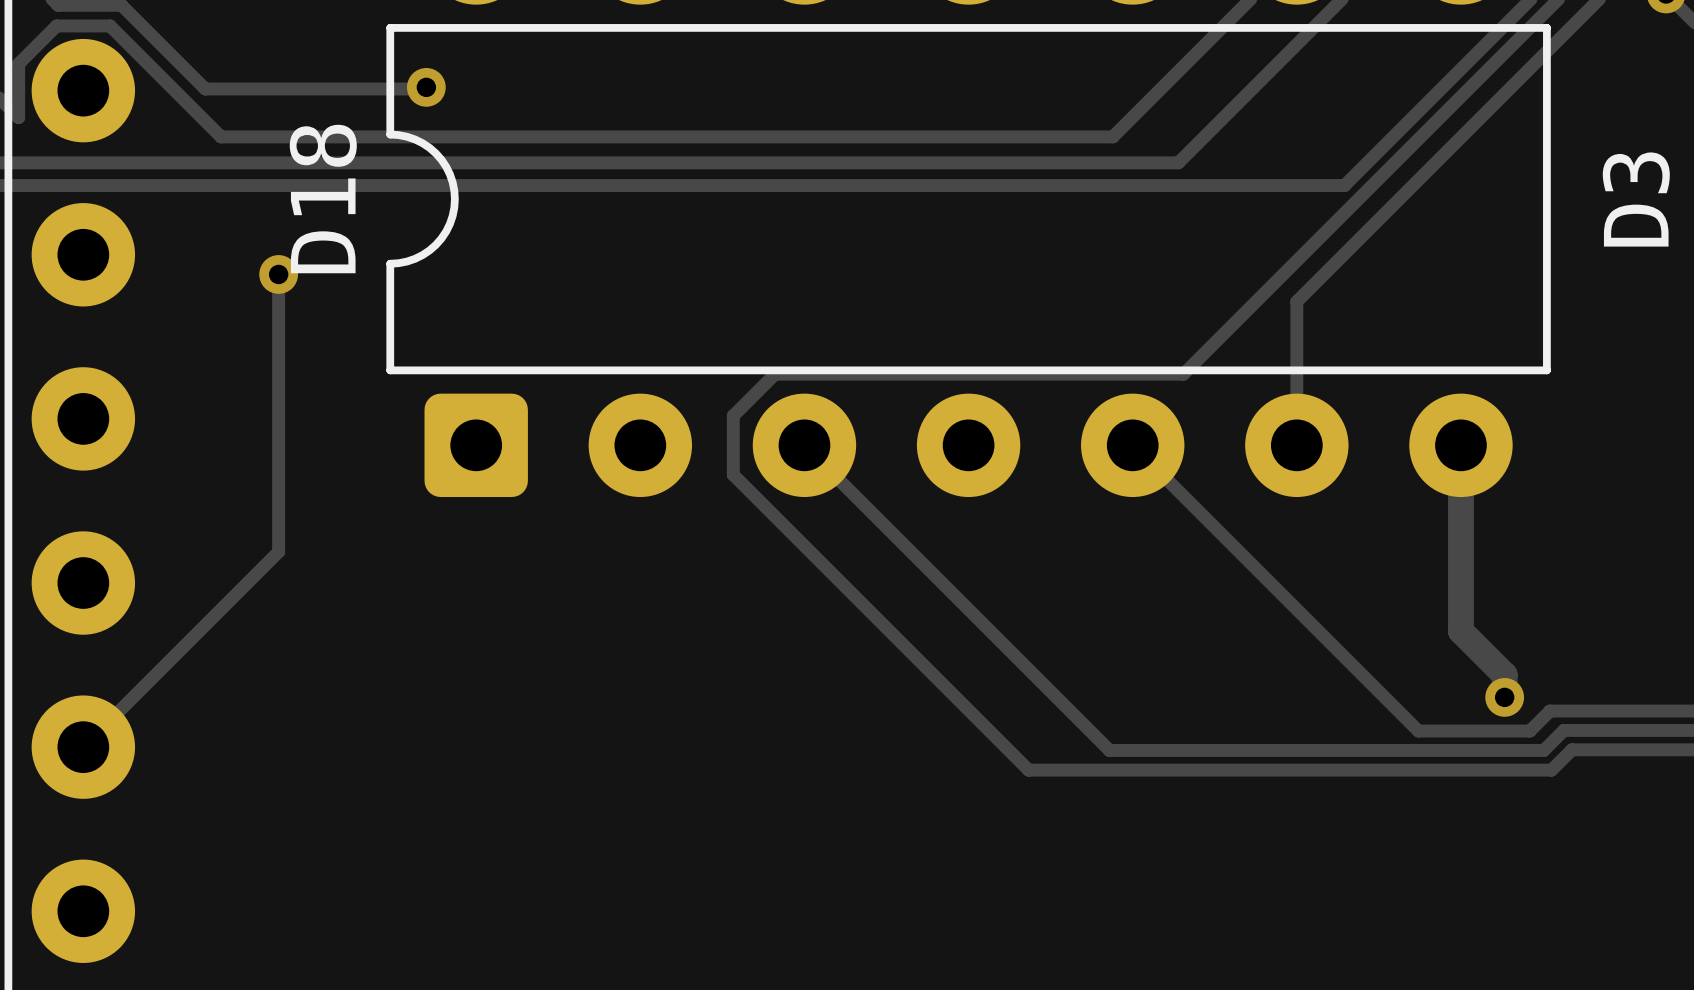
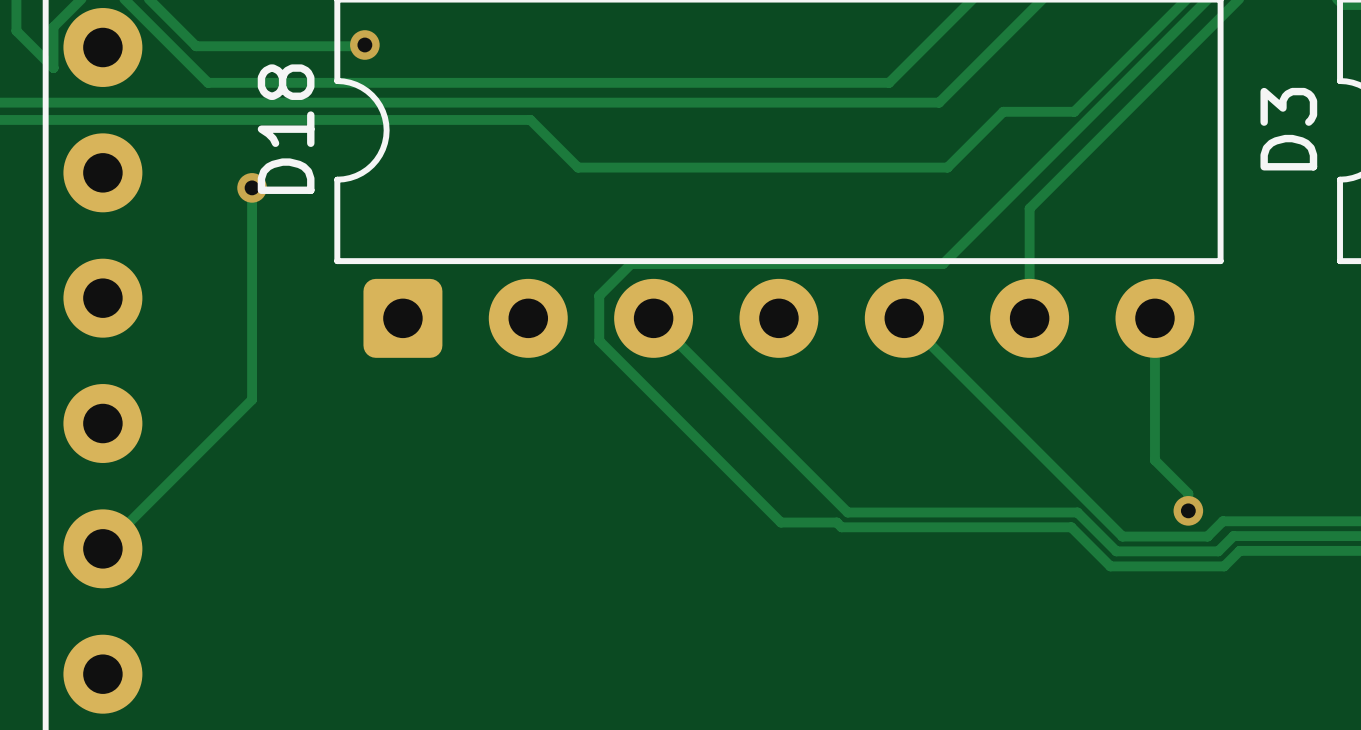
track: (1355, 174) (1344, 185) (643, 185) -> (1074, 111) (1003, 111) (947, 167) (578, 167) (530, 119)
track width: thick (1460, 445) (1460, 631) (1504, 674) (1504, 697) -> thin (1154, 318) (1154, 460) (1188, 493) (1188, 510)
track: (1058, 699) (1109, 750) (1410, 750) -> (847, 512) (1077, 512) (1116, 551)
track: (971, 712) (1028, 770) (1402, 770) -> (780, 522) (836, 522) (841, 527) (1071, 527) (1110, 566)

